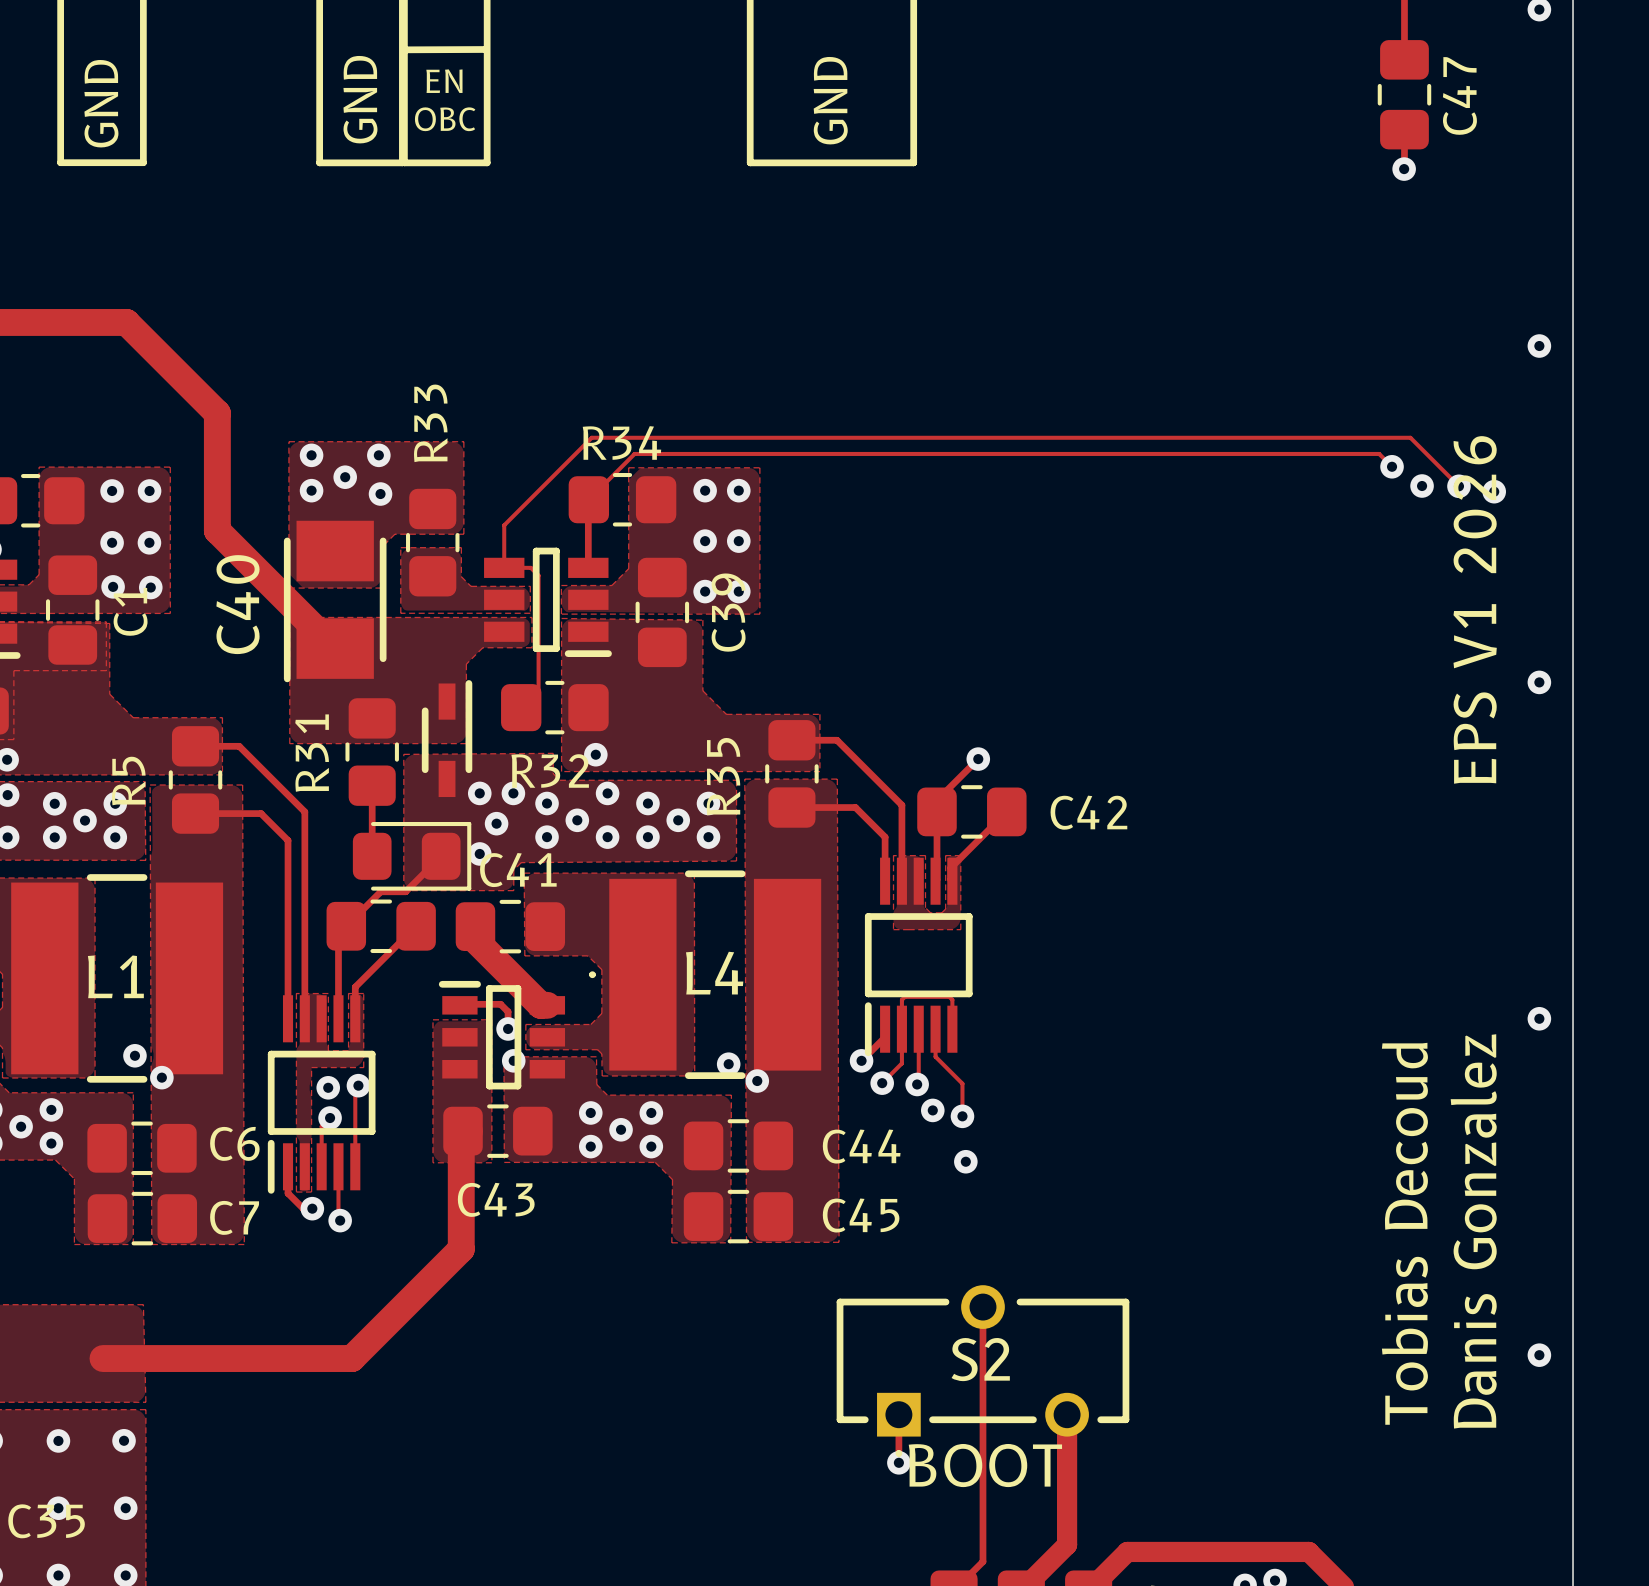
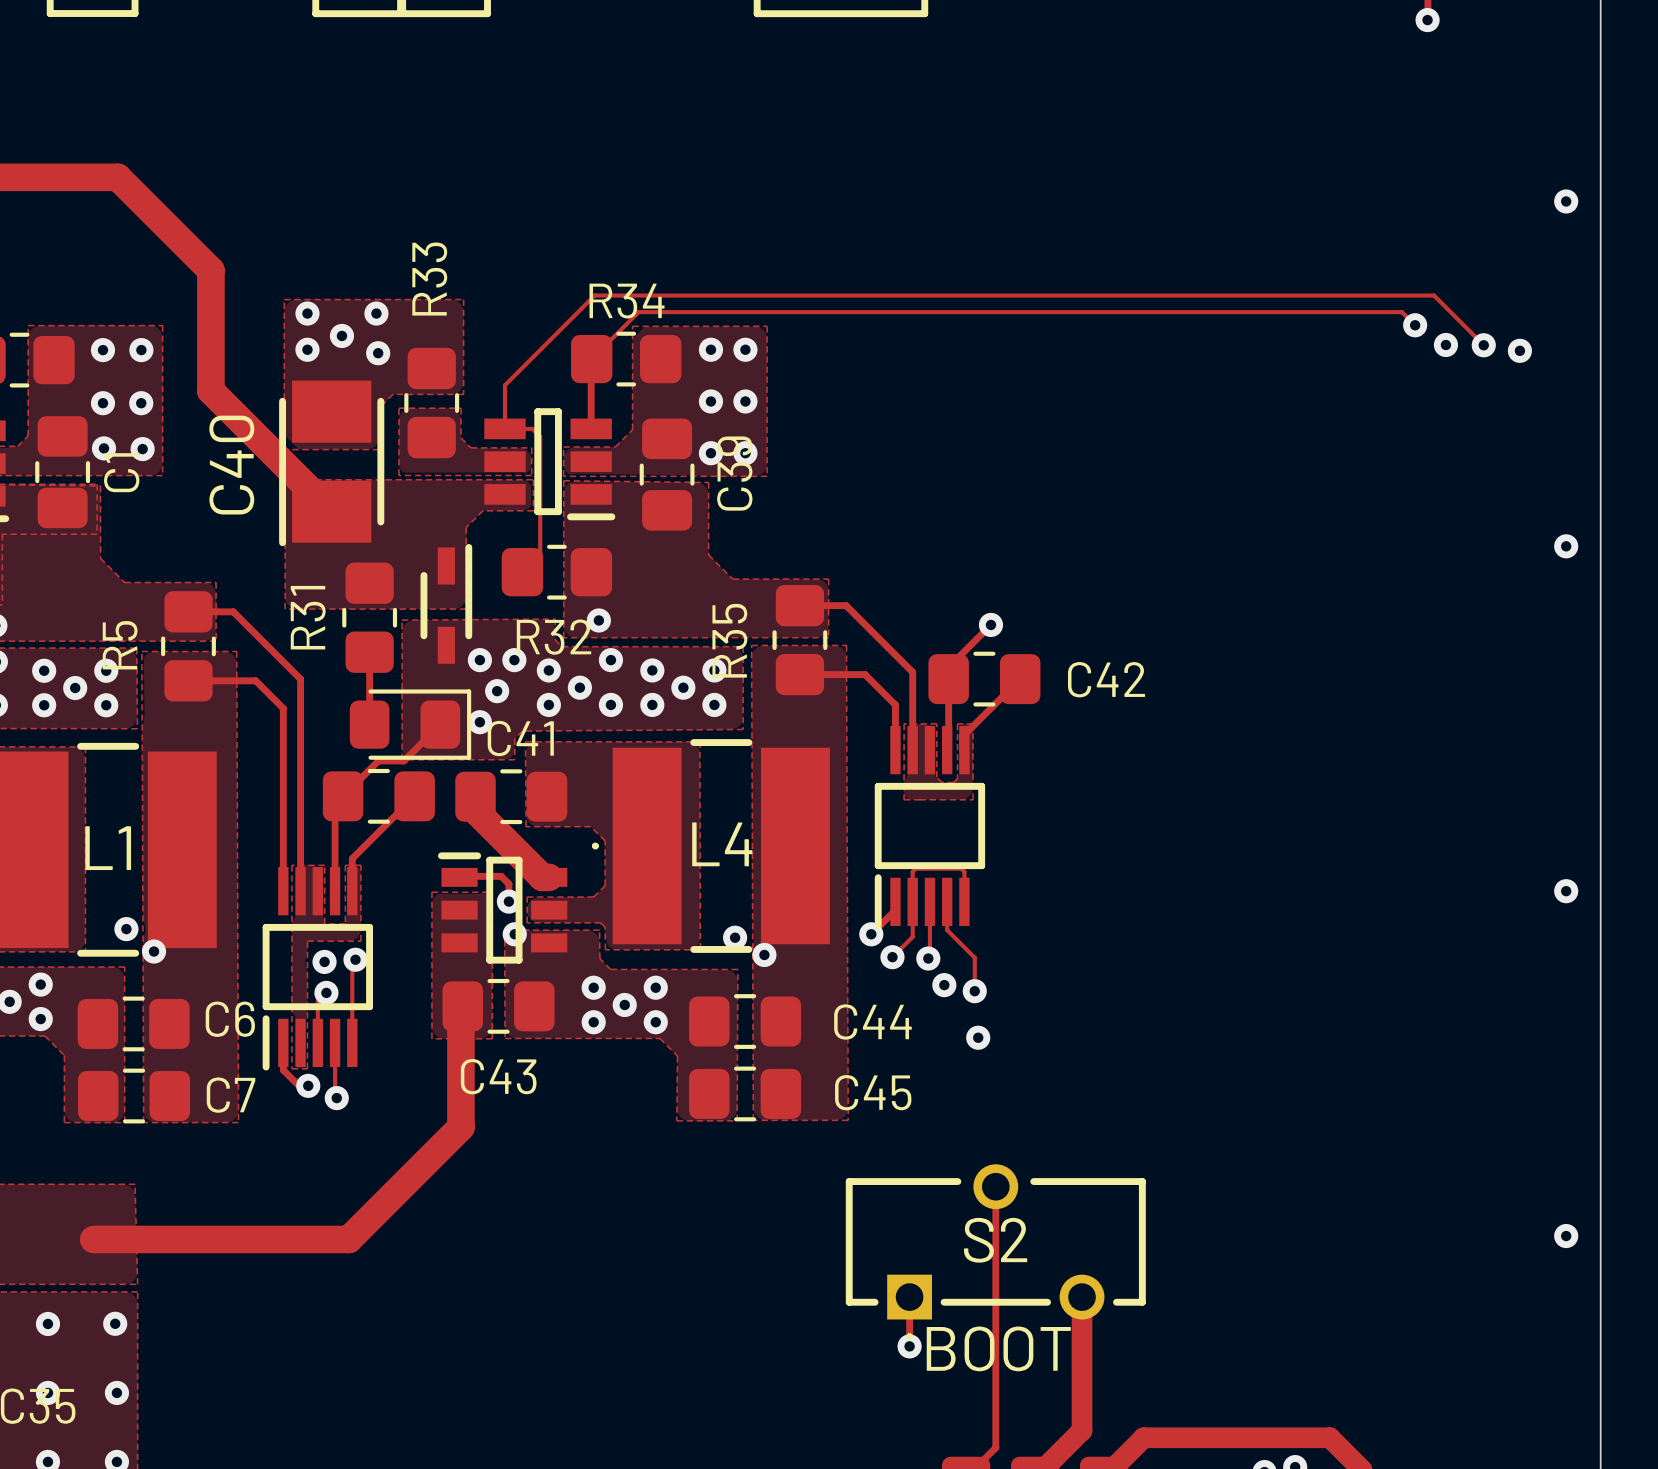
text: EPS V1 2026 (1475, 609) -> none
text: Danis Gonzalez (1473, 1231) -> none
text: Tobias Decoud (1404, 1233) -> none

